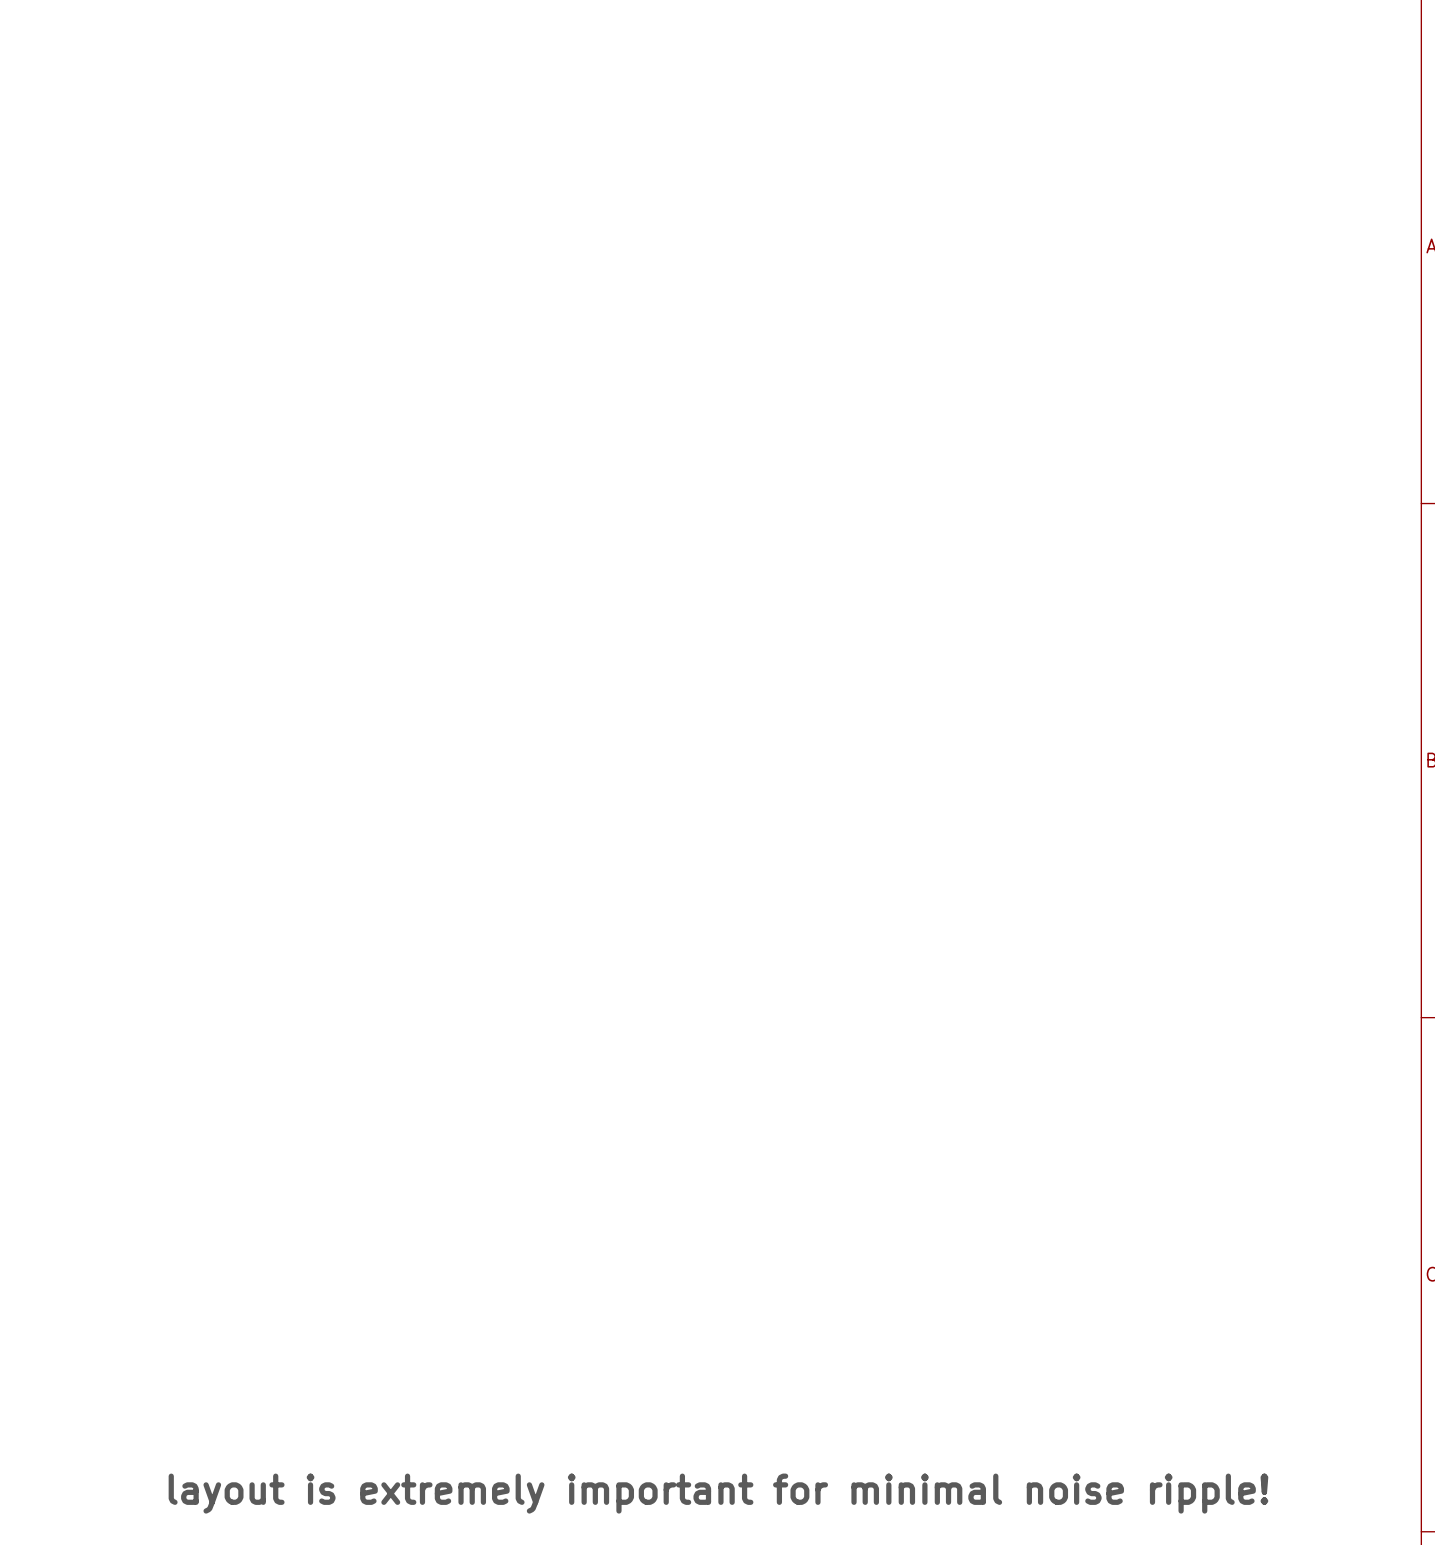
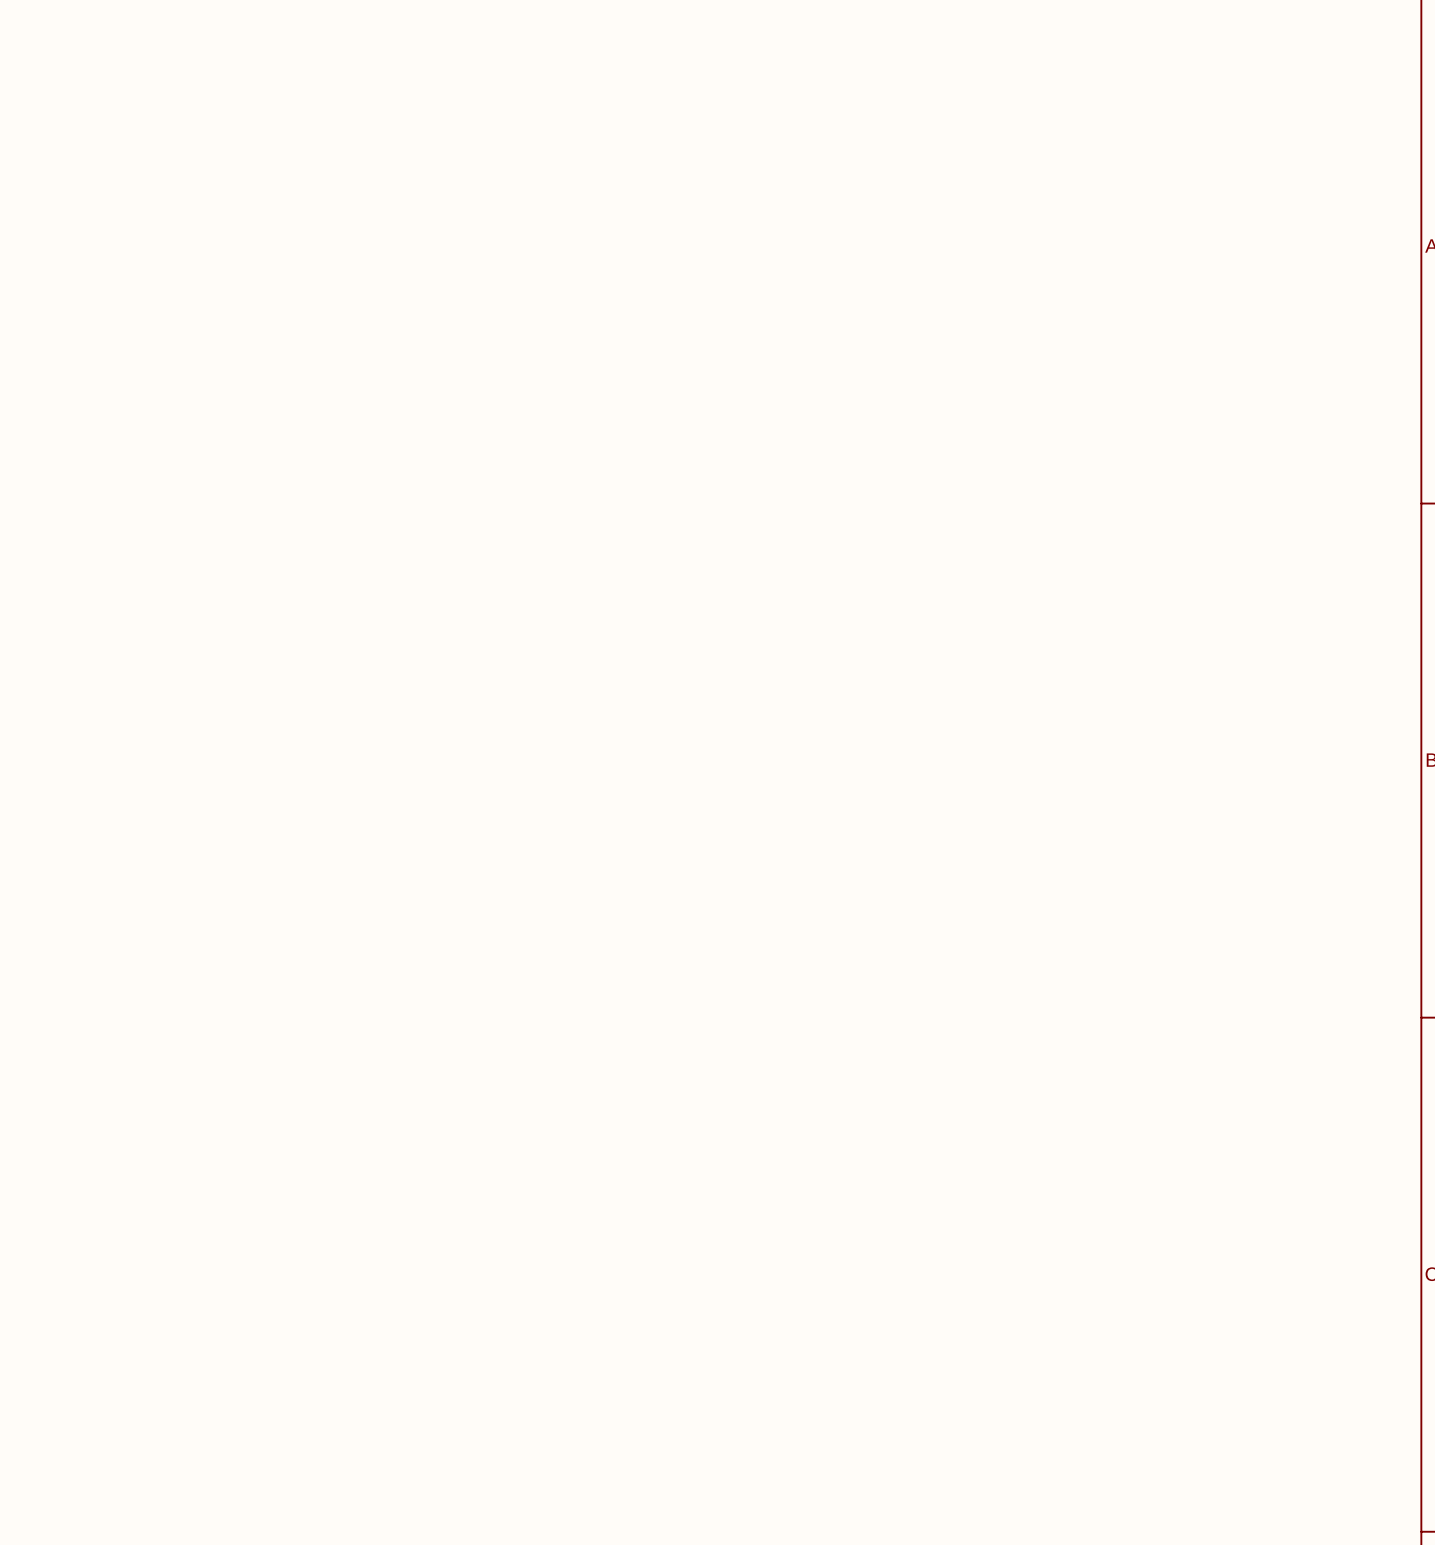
text: layout is extremely important for minimal noise ripple! (718, 1493) -> none

